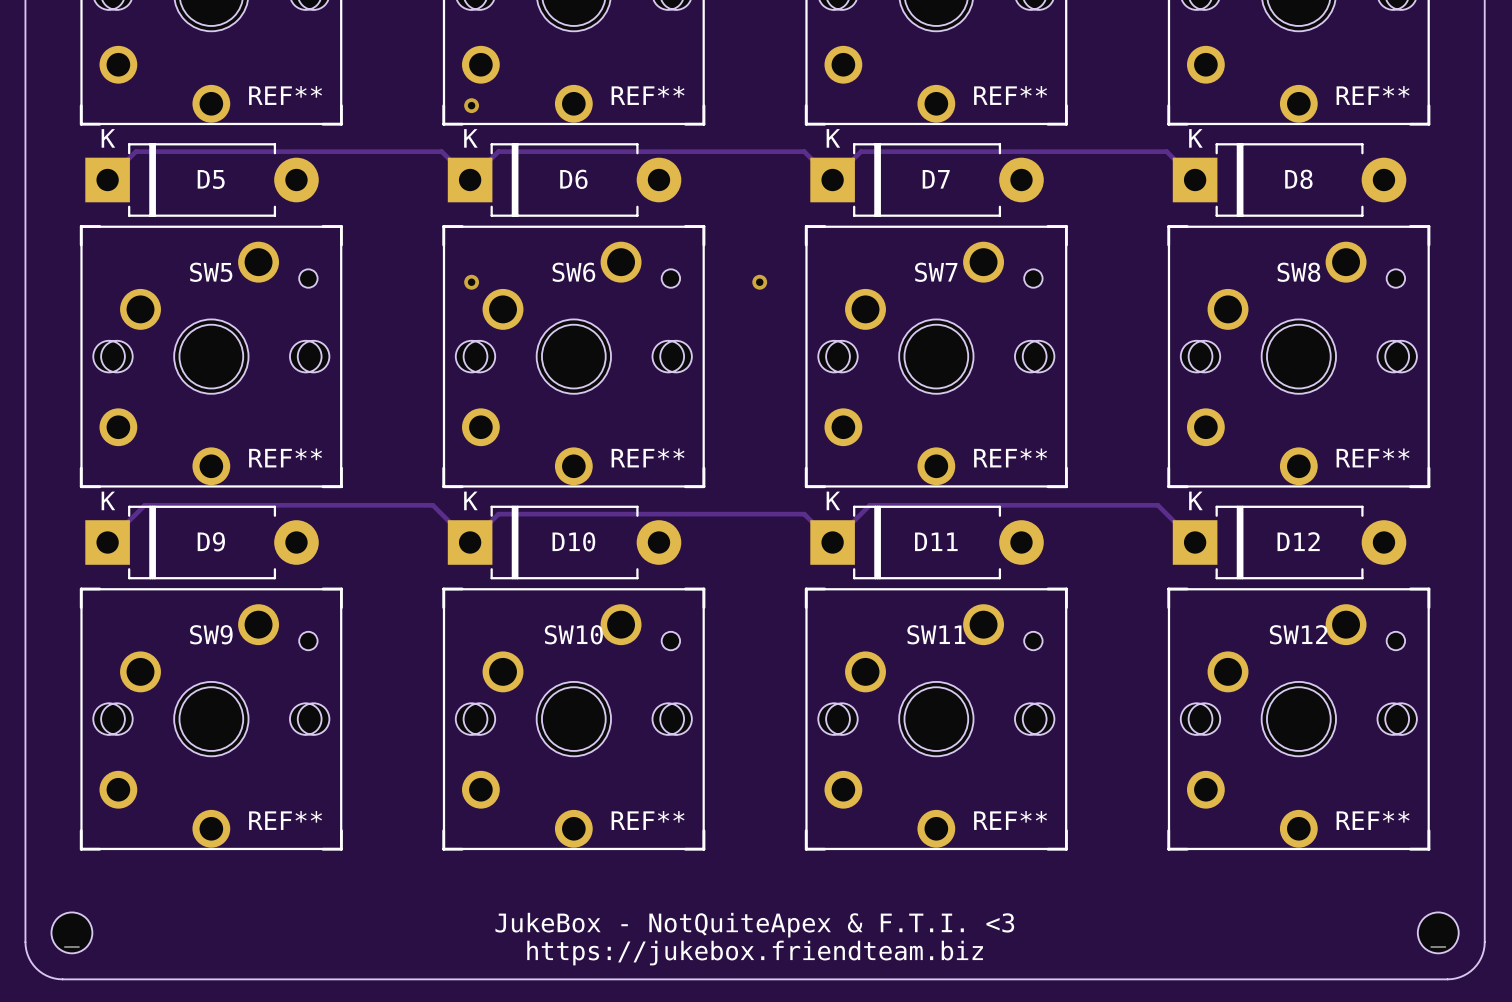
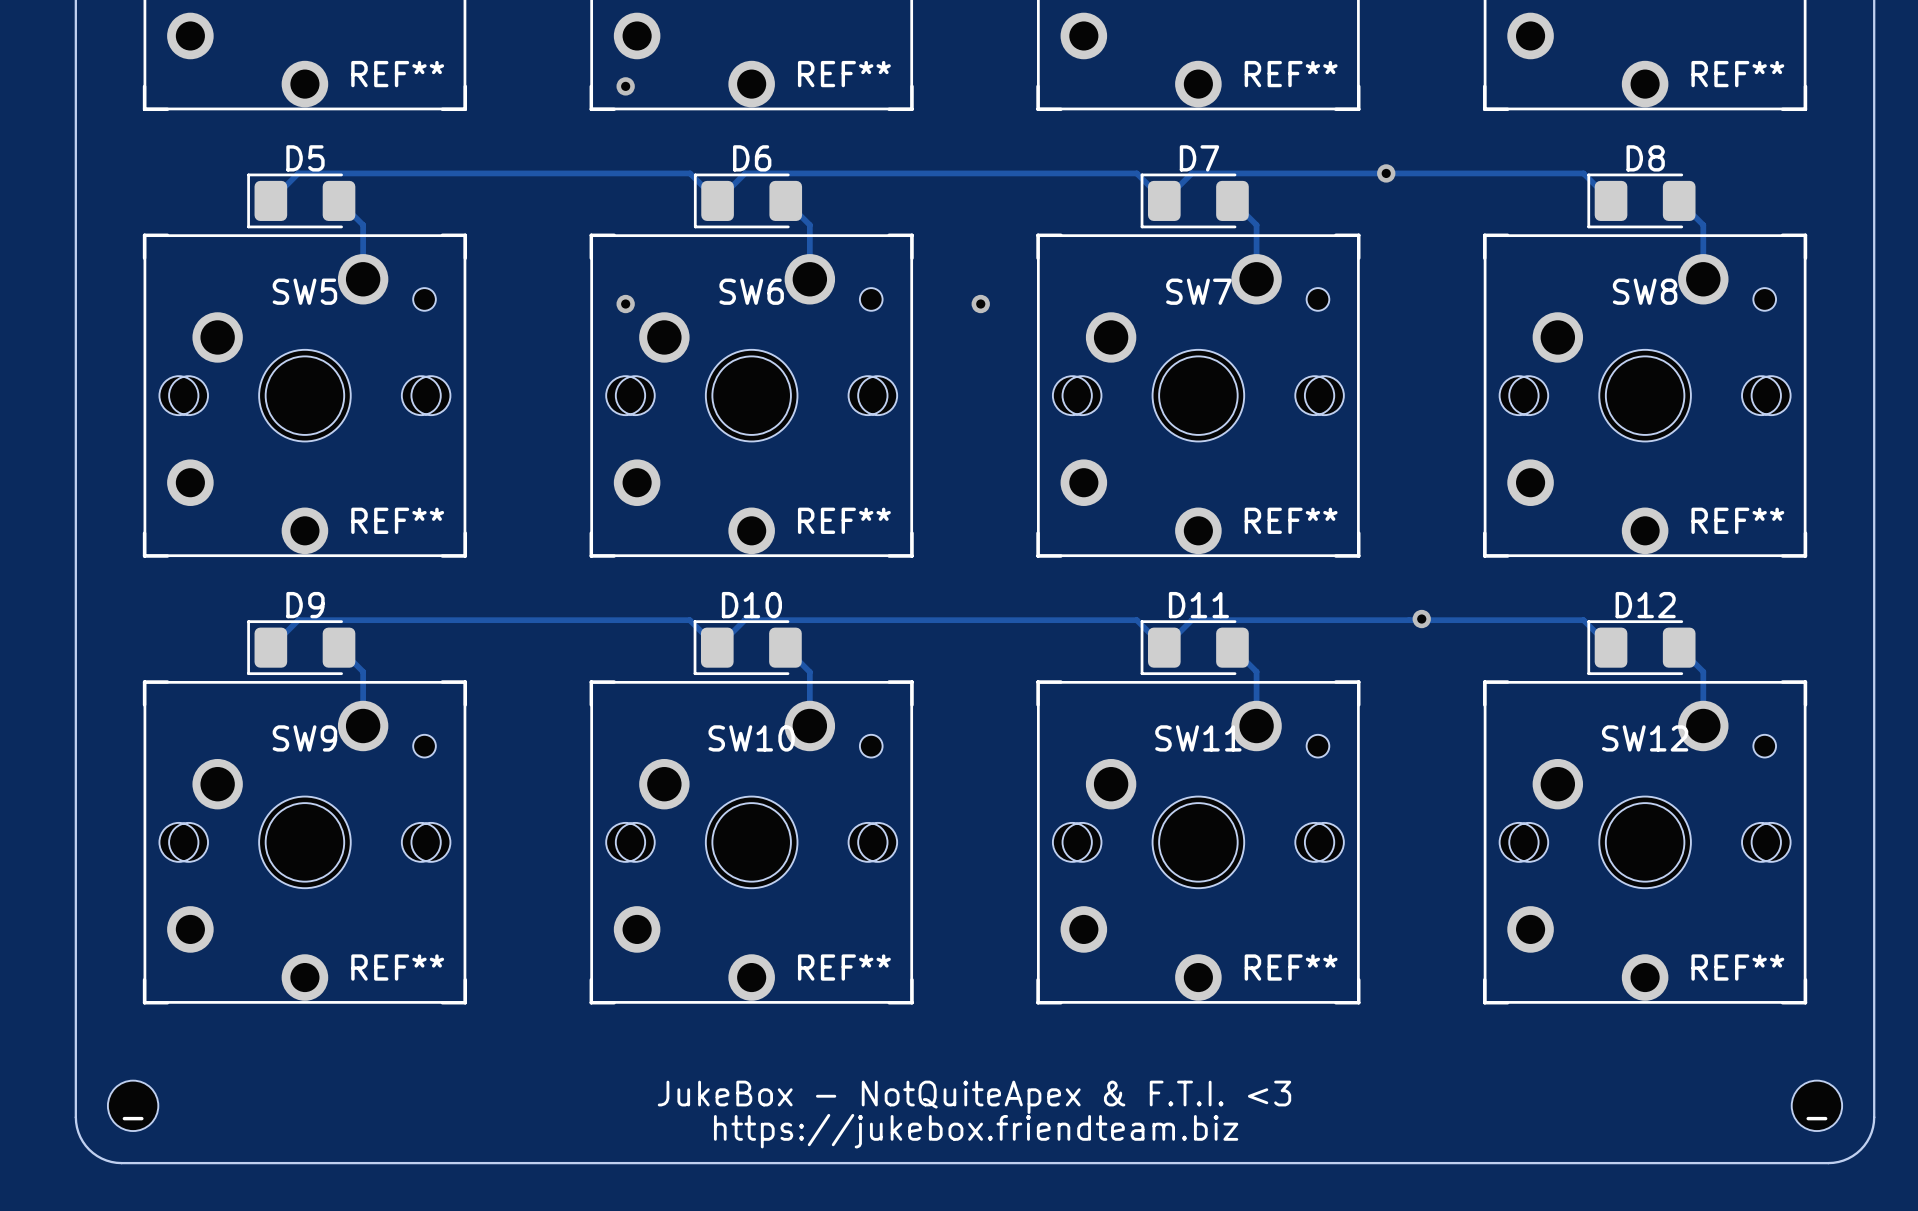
D5 footprint: [85, 143, 319, 217] -> [247, 173, 356, 229]
D6 footprint: [447, 143, 682, 217] -> [693, 173, 803, 229]
D7 footprint: [810, 143, 1044, 217] -> [1140, 173, 1249, 229]
D8 footprint: [1172, 143, 1407, 217] -> [1587, 173, 1696, 229]
via: none -> (1386, 173)
track: (107, 180) (135, 151) (441, 151) (470, 180) (498, 151) (804, 151) (832, 180) (860, 151) (1166, 151) (1195, 180) -> none
track: none -> (270, 200) (298, 173) (690, 173) (717, 200) (745, 173) (1136, 173) (1164, 200) (1191, 173) (1583, 173) (1611, 200)
track: none -> (339, 200) (363, 225) (363, 279)
track: none -> (785, 200) (809, 225) (809, 279)
track: none -> (1232, 200) (1256, 225) (1256, 279)
track: none -> (1679, 200) (1703, 225) (1703, 279)
D9 footprint: [85, 505, 319, 580] -> [247, 620, 356, 676]
D10 footprint: [447, 505, 682, 580] -> [693, 620, 802, 676]
D11 footprint: [810, 505, 1044, 580] -> [1140, 620, 1249, 676]
D12 footprint: [1172, 505, 1407, 580] -> [1587, 620, 1696, 676]
via: none -> (1421, 619)
track: (107, 542) (144, 505) (432, 505) (470, 542) (498, 514) (804, 514) (832, 542) (869, 505) (1157, 505) (1195, 542) -> none
track: none -> (270, 647) (298, 620) (689, 620) (717, 647) (744, 620) (1136, 620) (1164, 647) (1191, 620) (1583, 620) (1611, 647)
track: none -> (339, 647) (363, 671) (363, 726)
track: none -> (785, 647) (809, 672) (809, 726)
track: none -> (1232, 647) (1256, 671) (1256, 726)
track: none -> (1679, 647) (1703, 671) (1703, 726)

